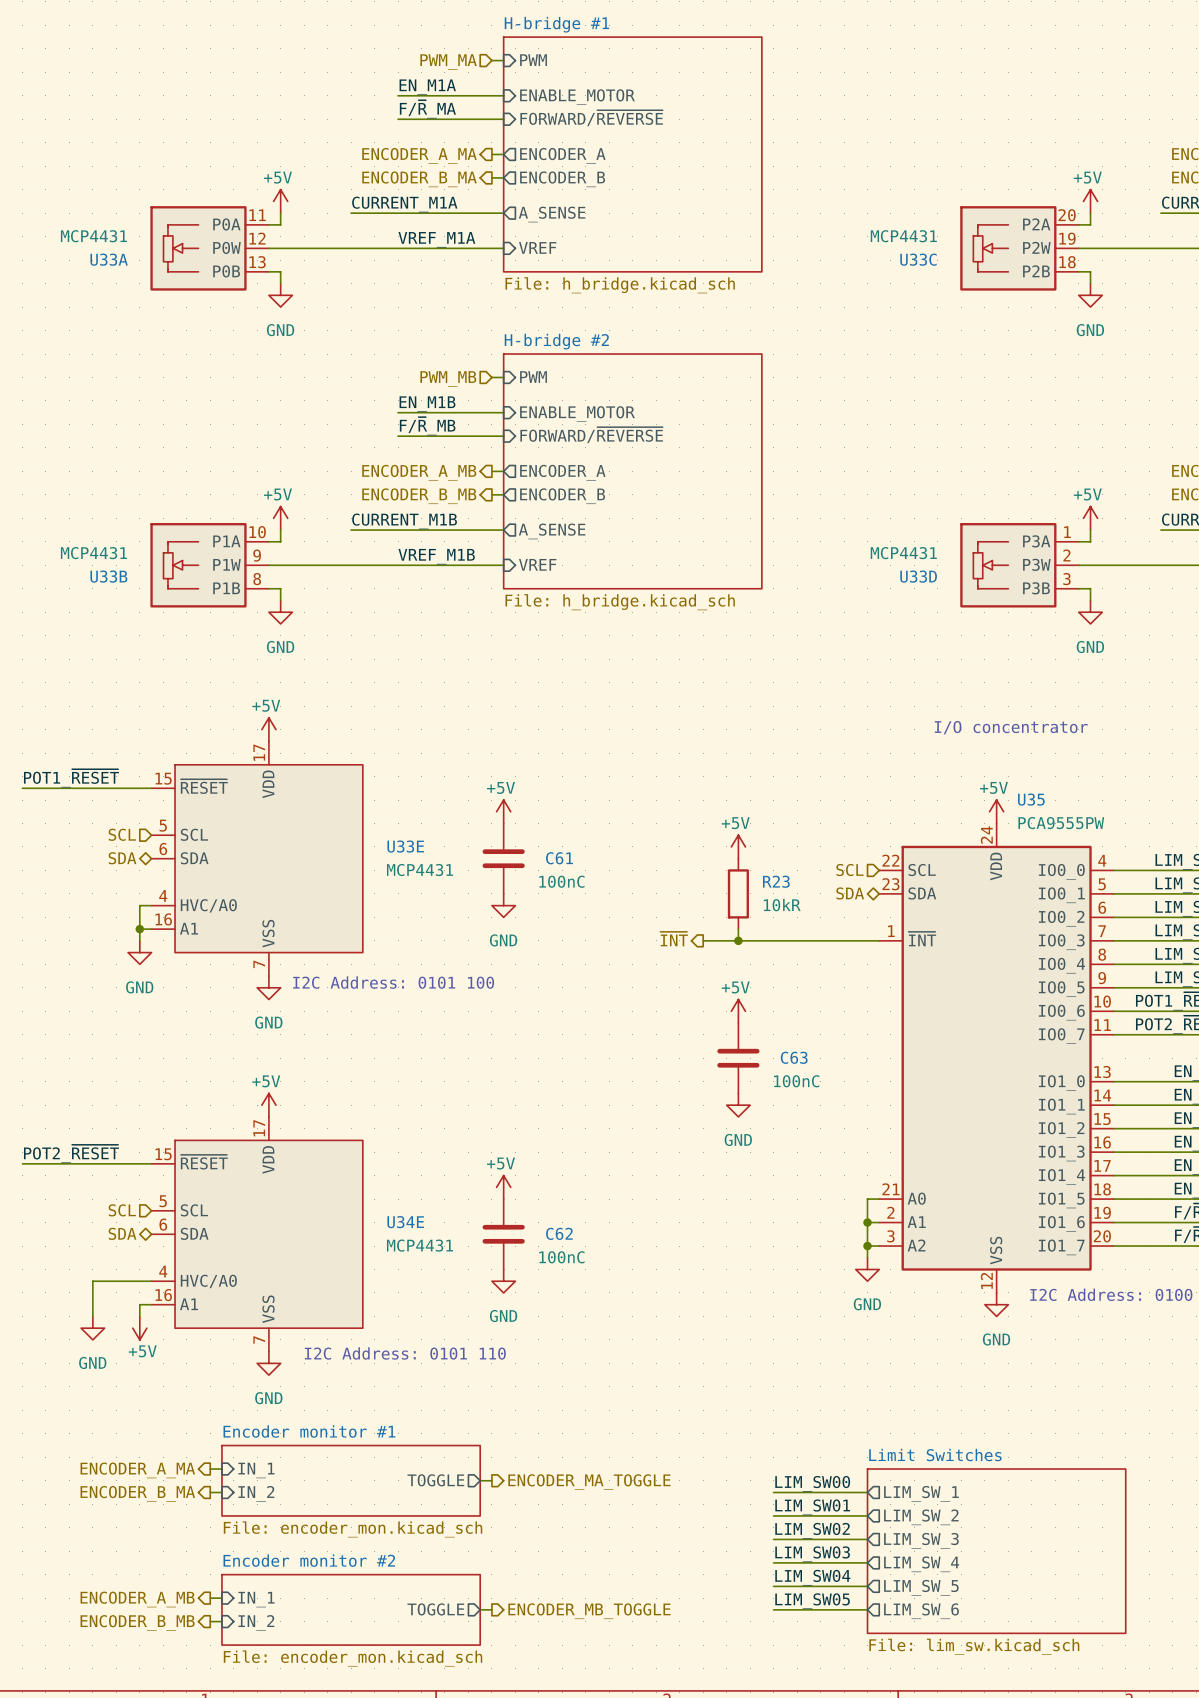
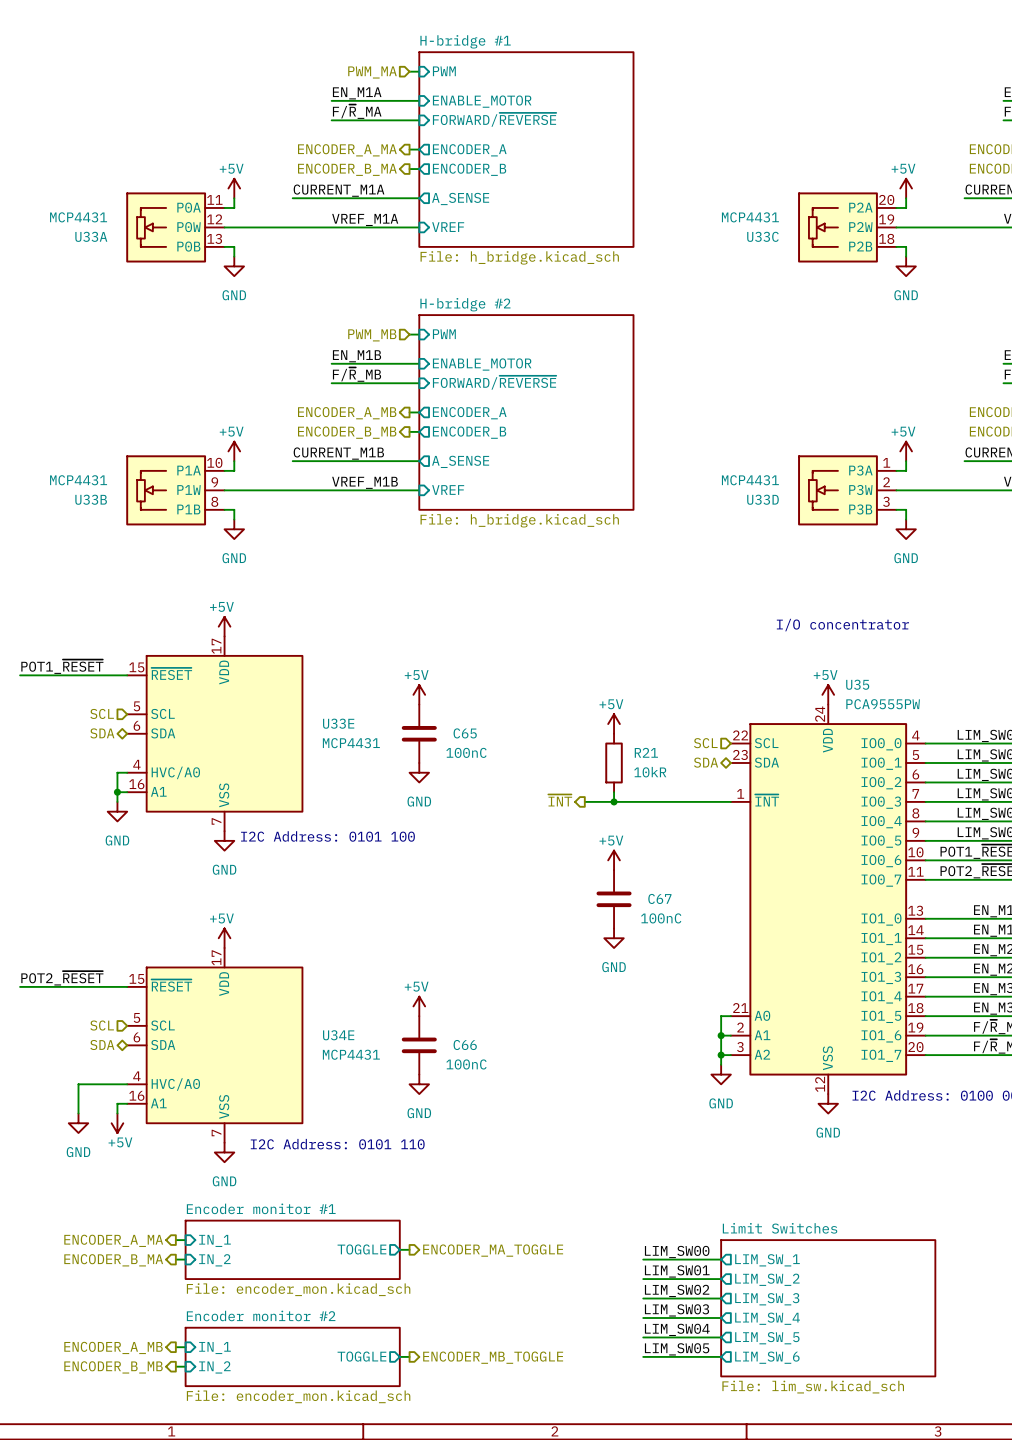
C61 name: C61 (559, 858) -> C65 (465, 733)
R23 name: R23 (776, 881) -> R21 (646, 752)
C63 name: C63 (794, 1057) -> C67 (659, 898)
C62 name: C62 (559, 1233) -> C66 (465, 1045)

